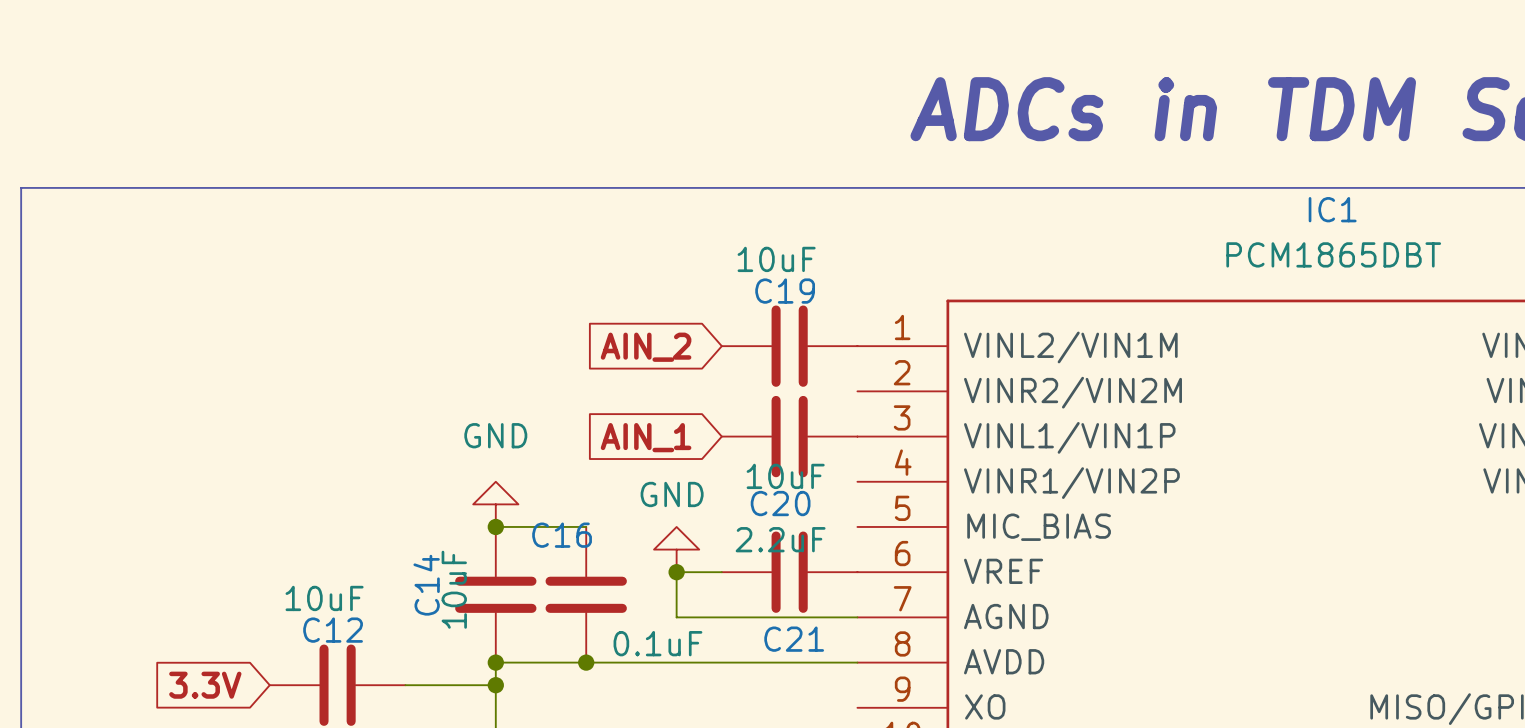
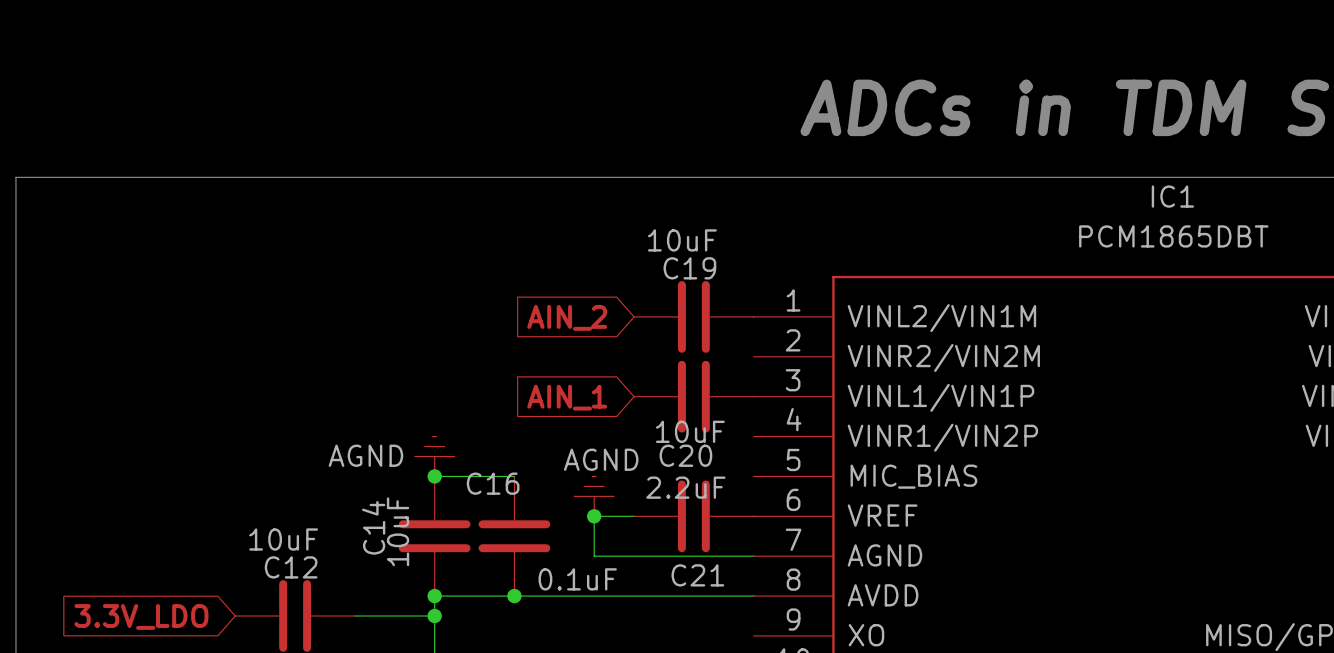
power symbol: GND (495, 504) -> AGND (434, 456)
power symbol: GND (676, 549) -> AGND (594, 496)
global label: 3.3V (205, 685) -> 3.3V_LDO (141, 616)

